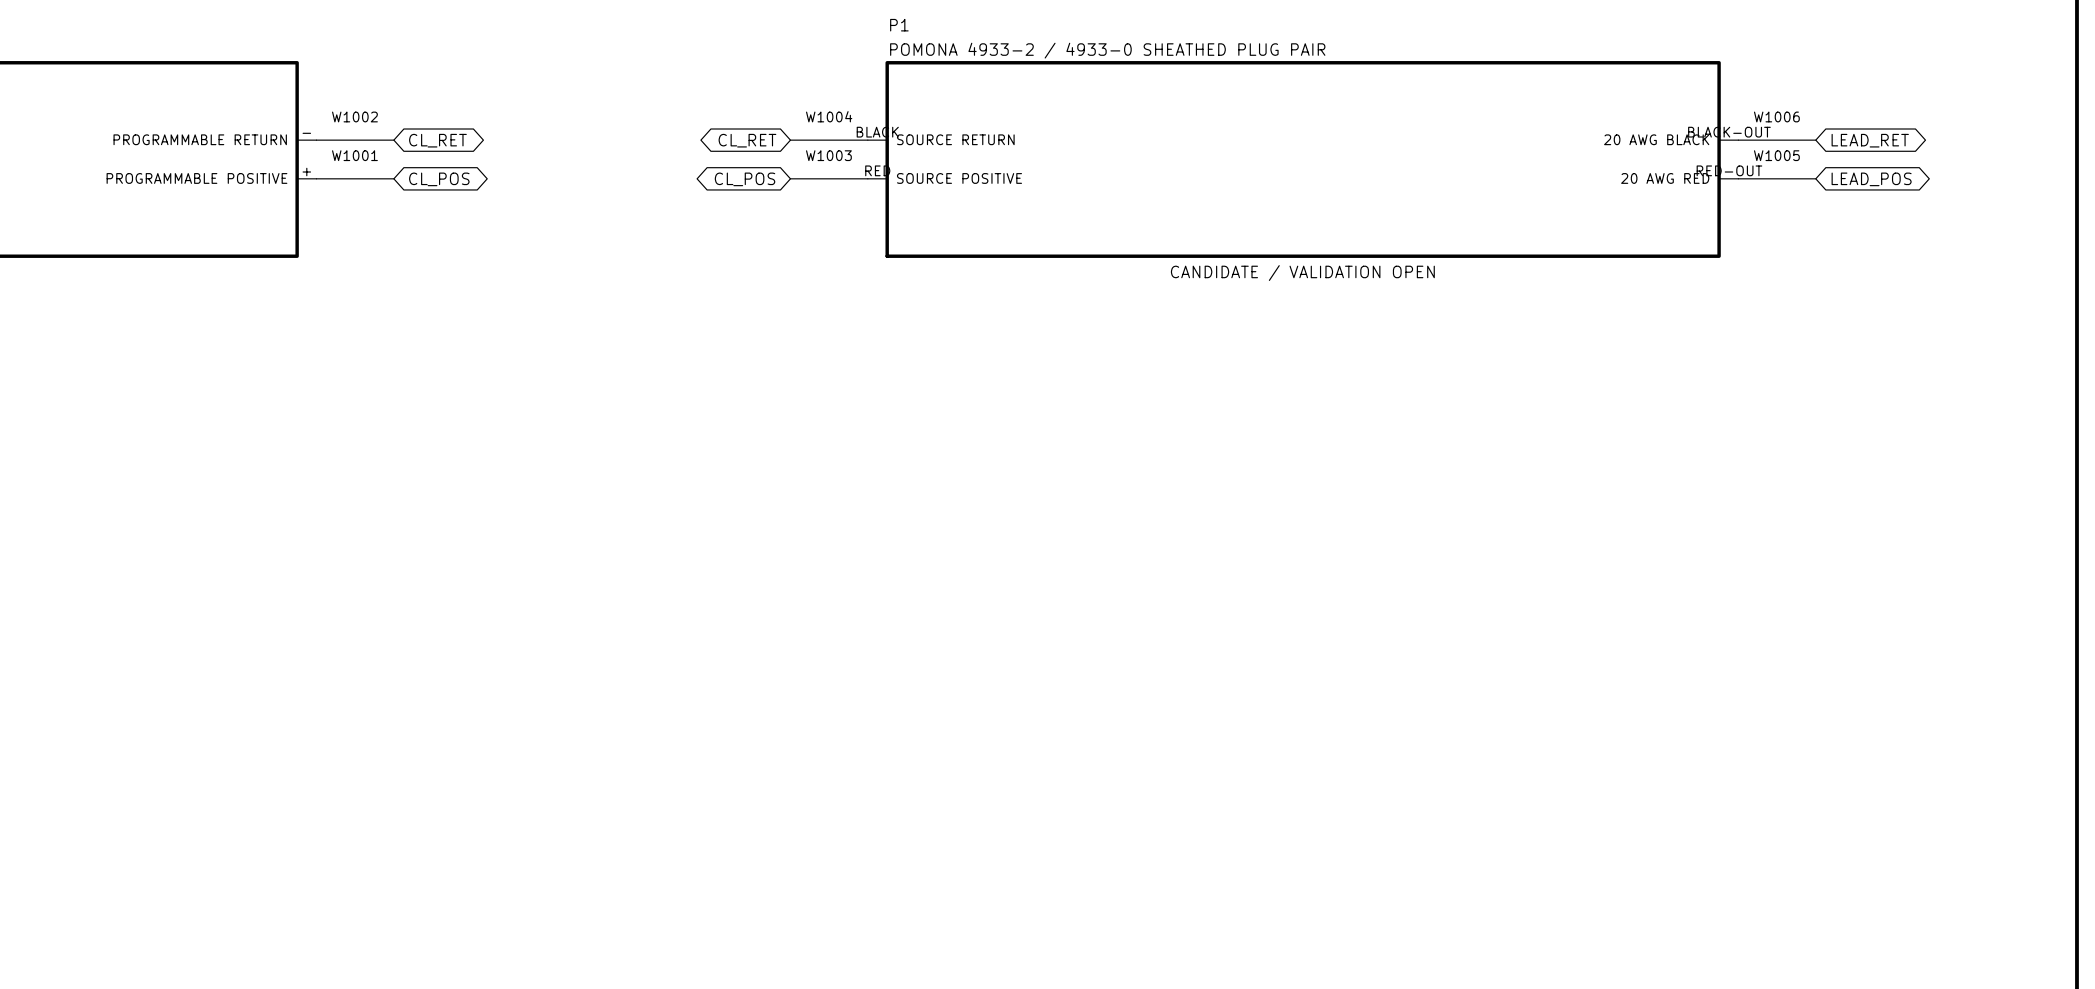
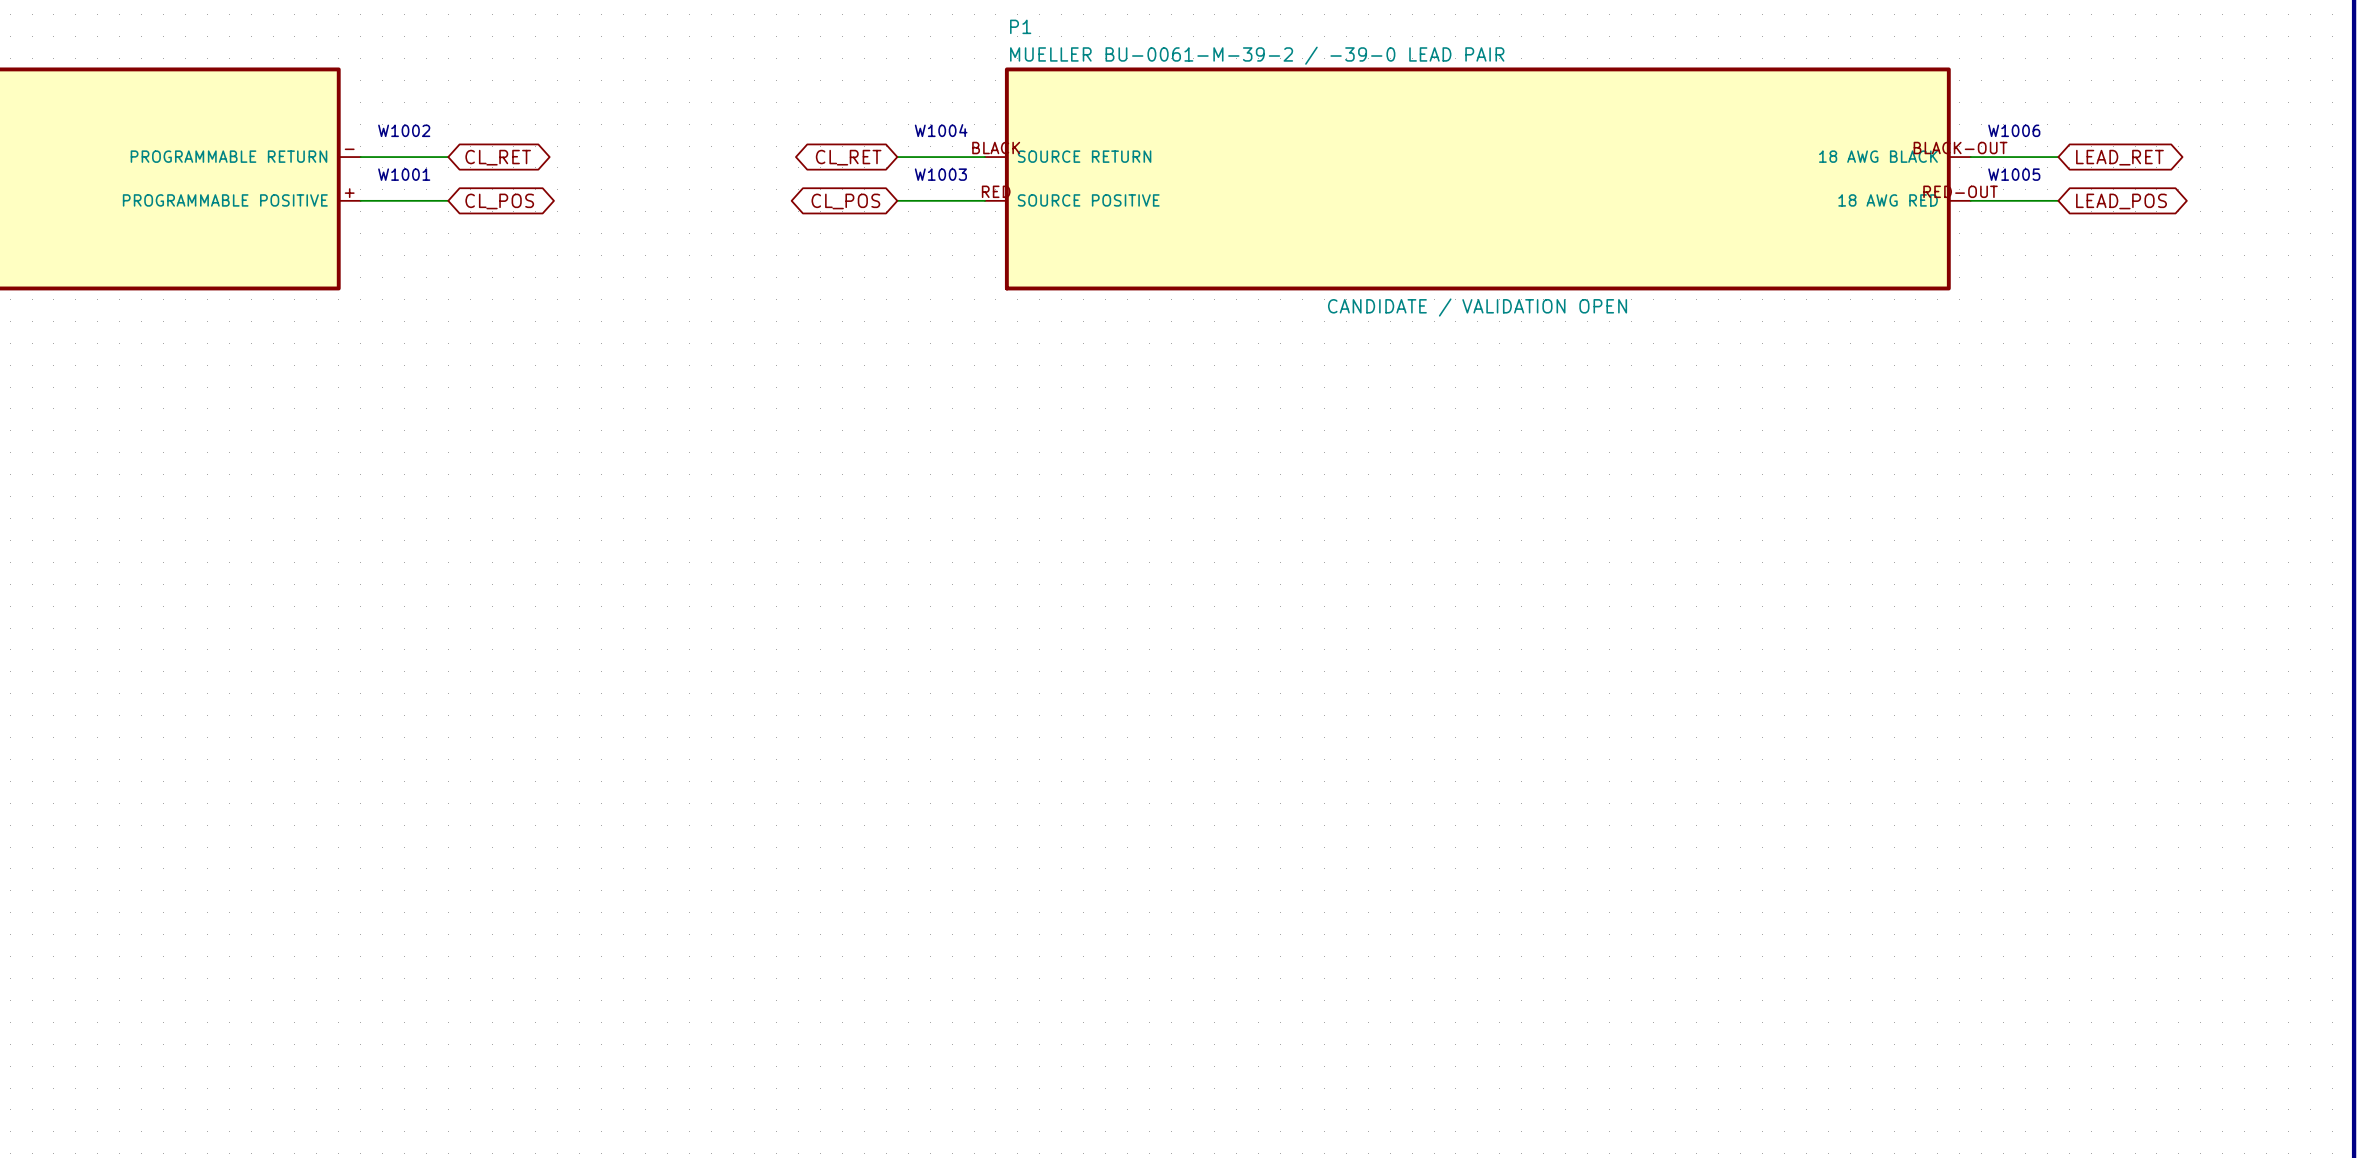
P1 text: POMONA 4933-2 / 4933-0 SHEATHED PLUG PAIR (1107, 50) -> MUELLER BU-0061-M-39-2 / -39-0 LEAD PAIR (1257, 55)
P1 pin name: 20 AWG BLACK (1656, 139) -> 18 AWG BLACK (1878, 156)
P1 pin name: 20 AWG RED (1665, 178) -> 18 AWG RED (1888, 200)

